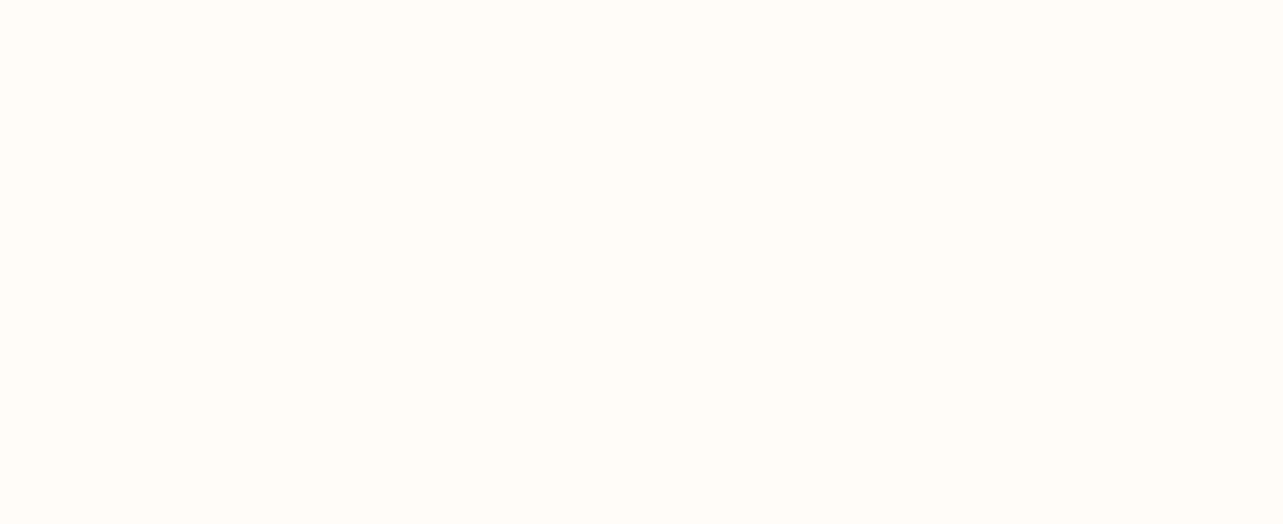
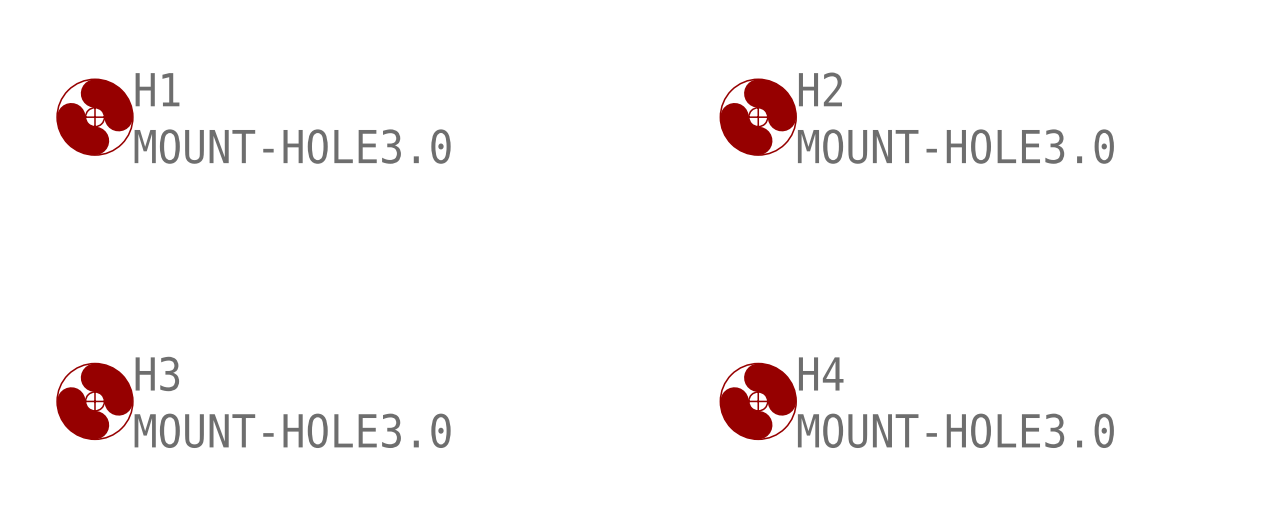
H1: none -> MOUNT-HOLE3.0 (94, 117)
H2: none -> MOUNT-HOLE3.0 (758, 117)
H3: none -> MOUNT-HOLE3.0 (94, 401)
H4: none -> MOUNT-HOLE3.0 (758, 401)

